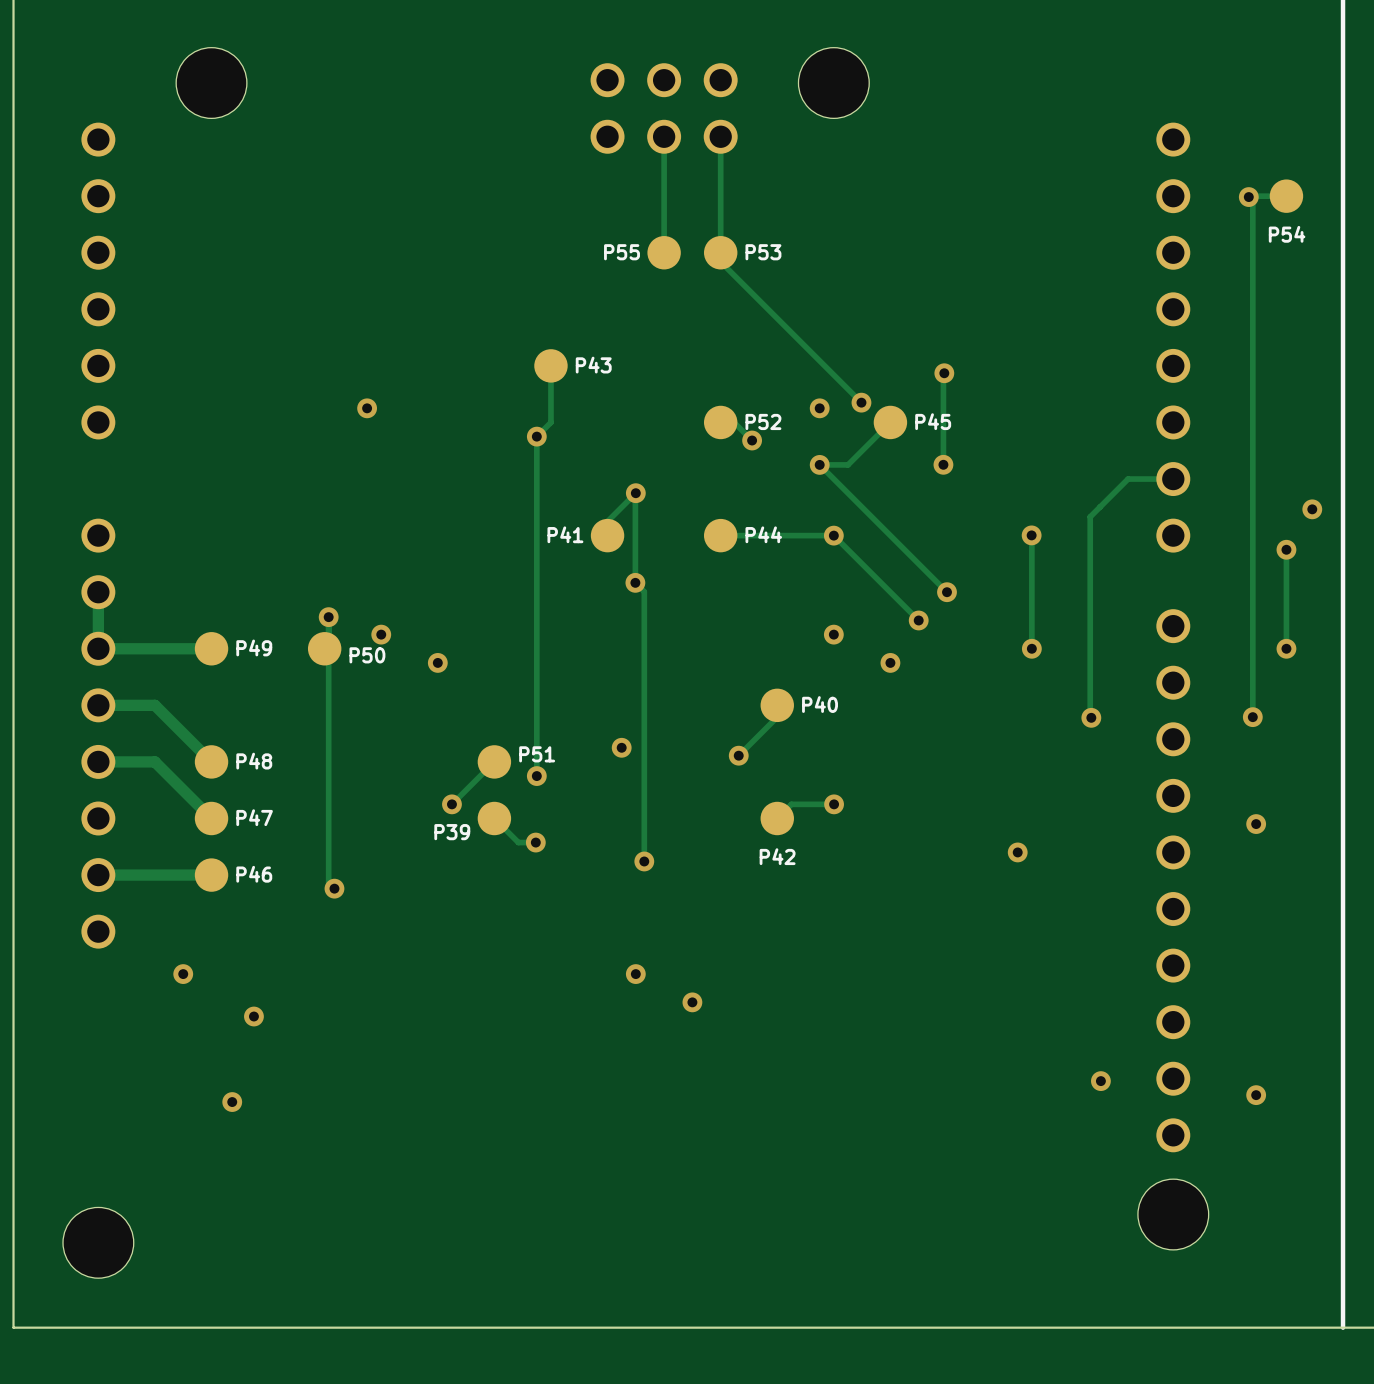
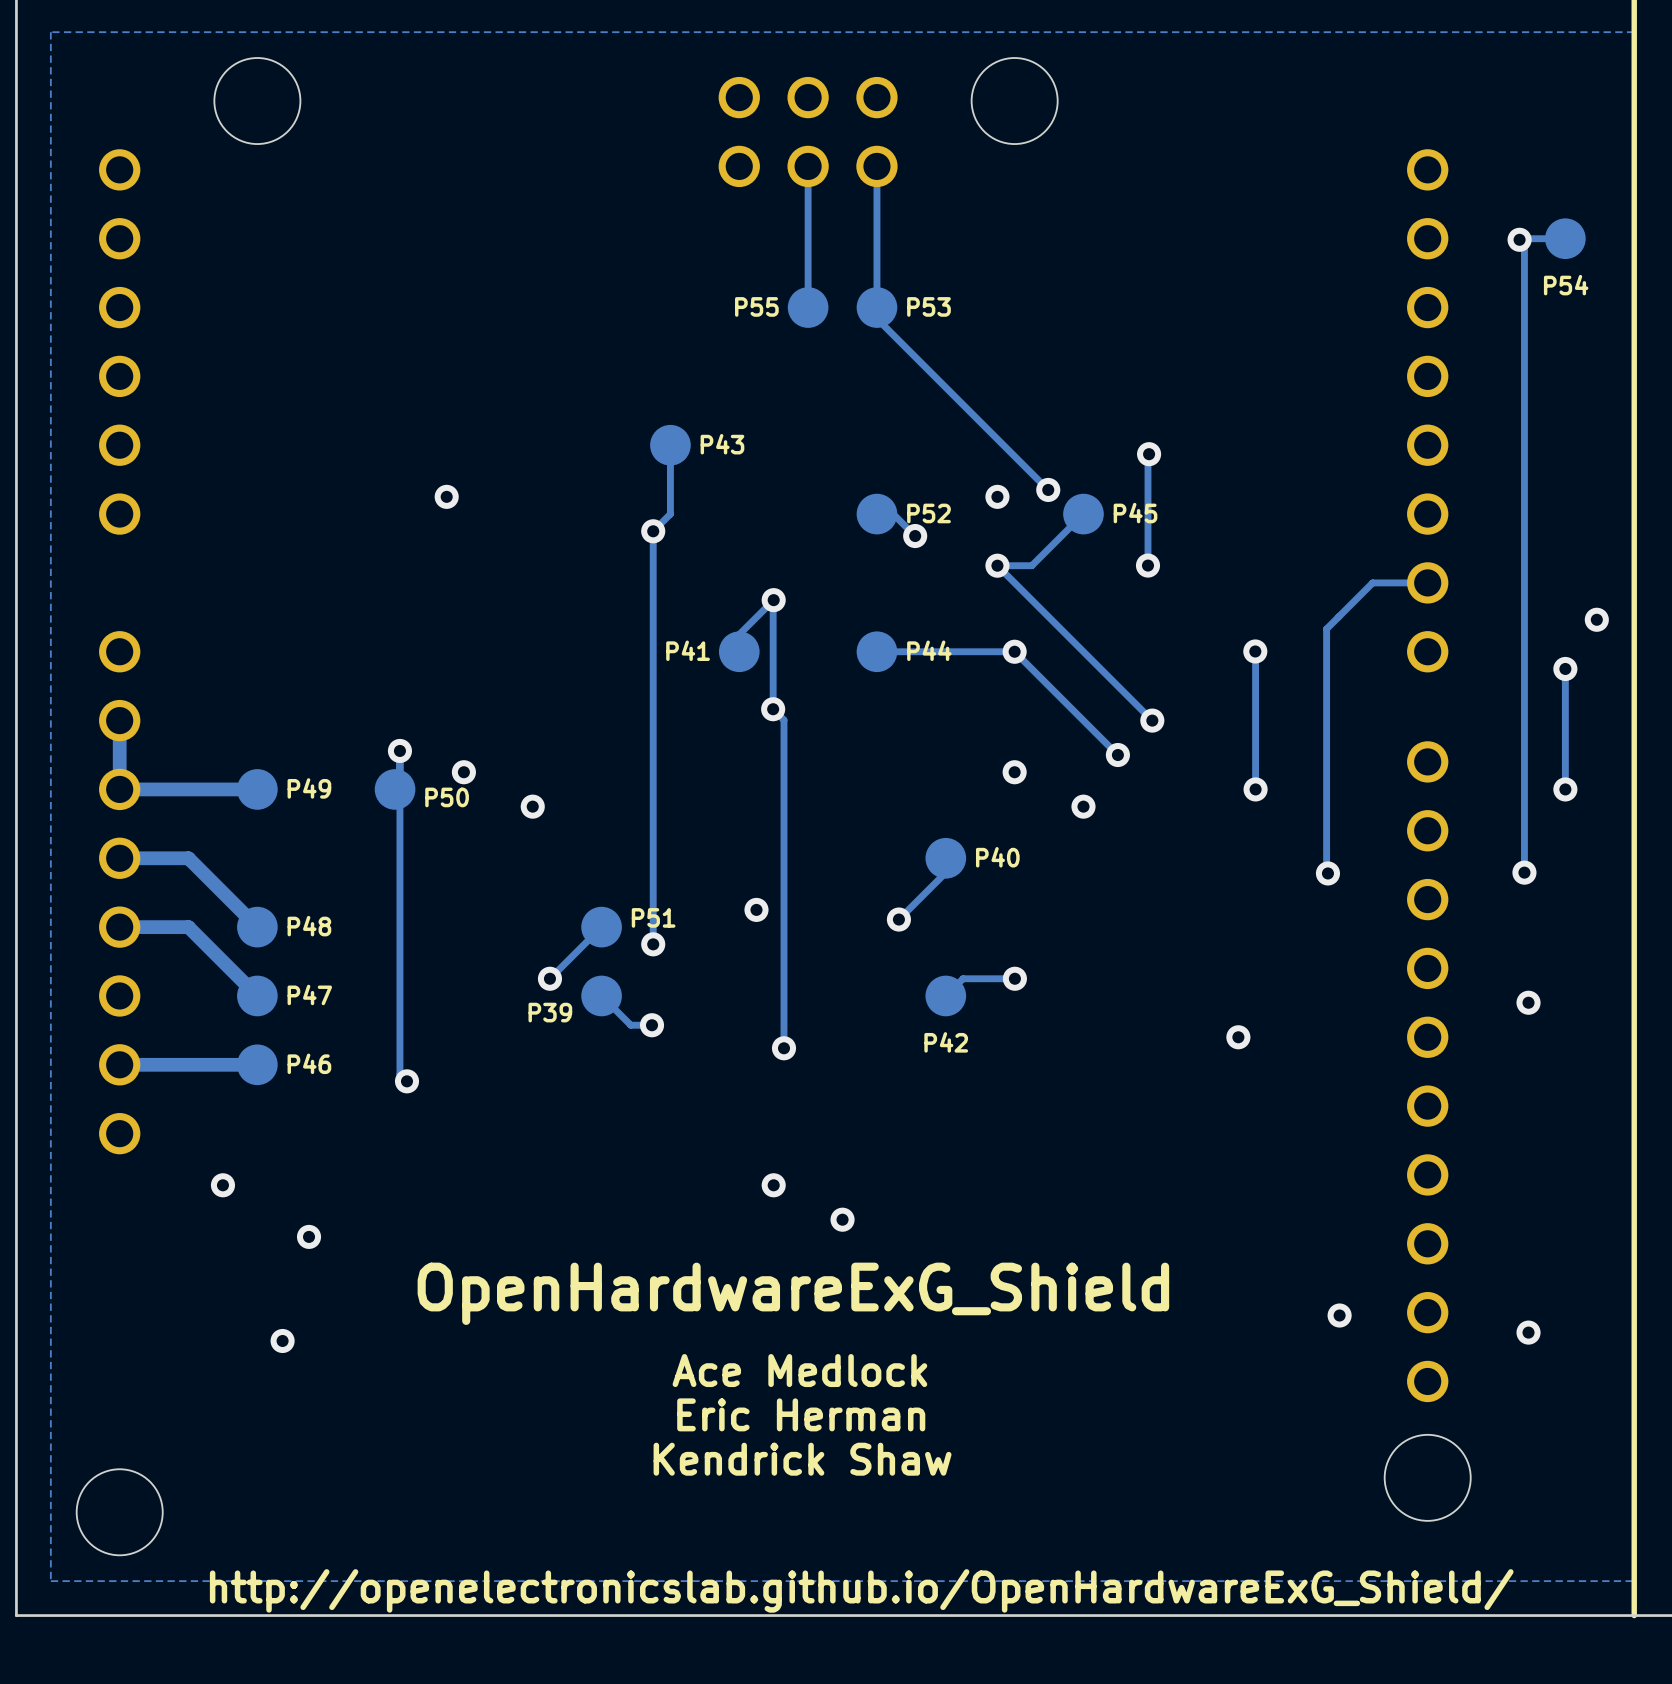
zone outline: none -> (1634, 32) (1634, 1581) (50, 1581) (50, 32) (1634, 32)
text: none -> OpenHardwareExG_Shield (793, 1293)
text: none -> Ace Medlock (799, 1370)
text: none -> Eric Herman (801, 1414)
text: none -> Kendrick Shaw (802, 1459)
text: none -> http://openelectronicslab.github.io/OpenHardwareExG_Shield/ (861, 1590)

